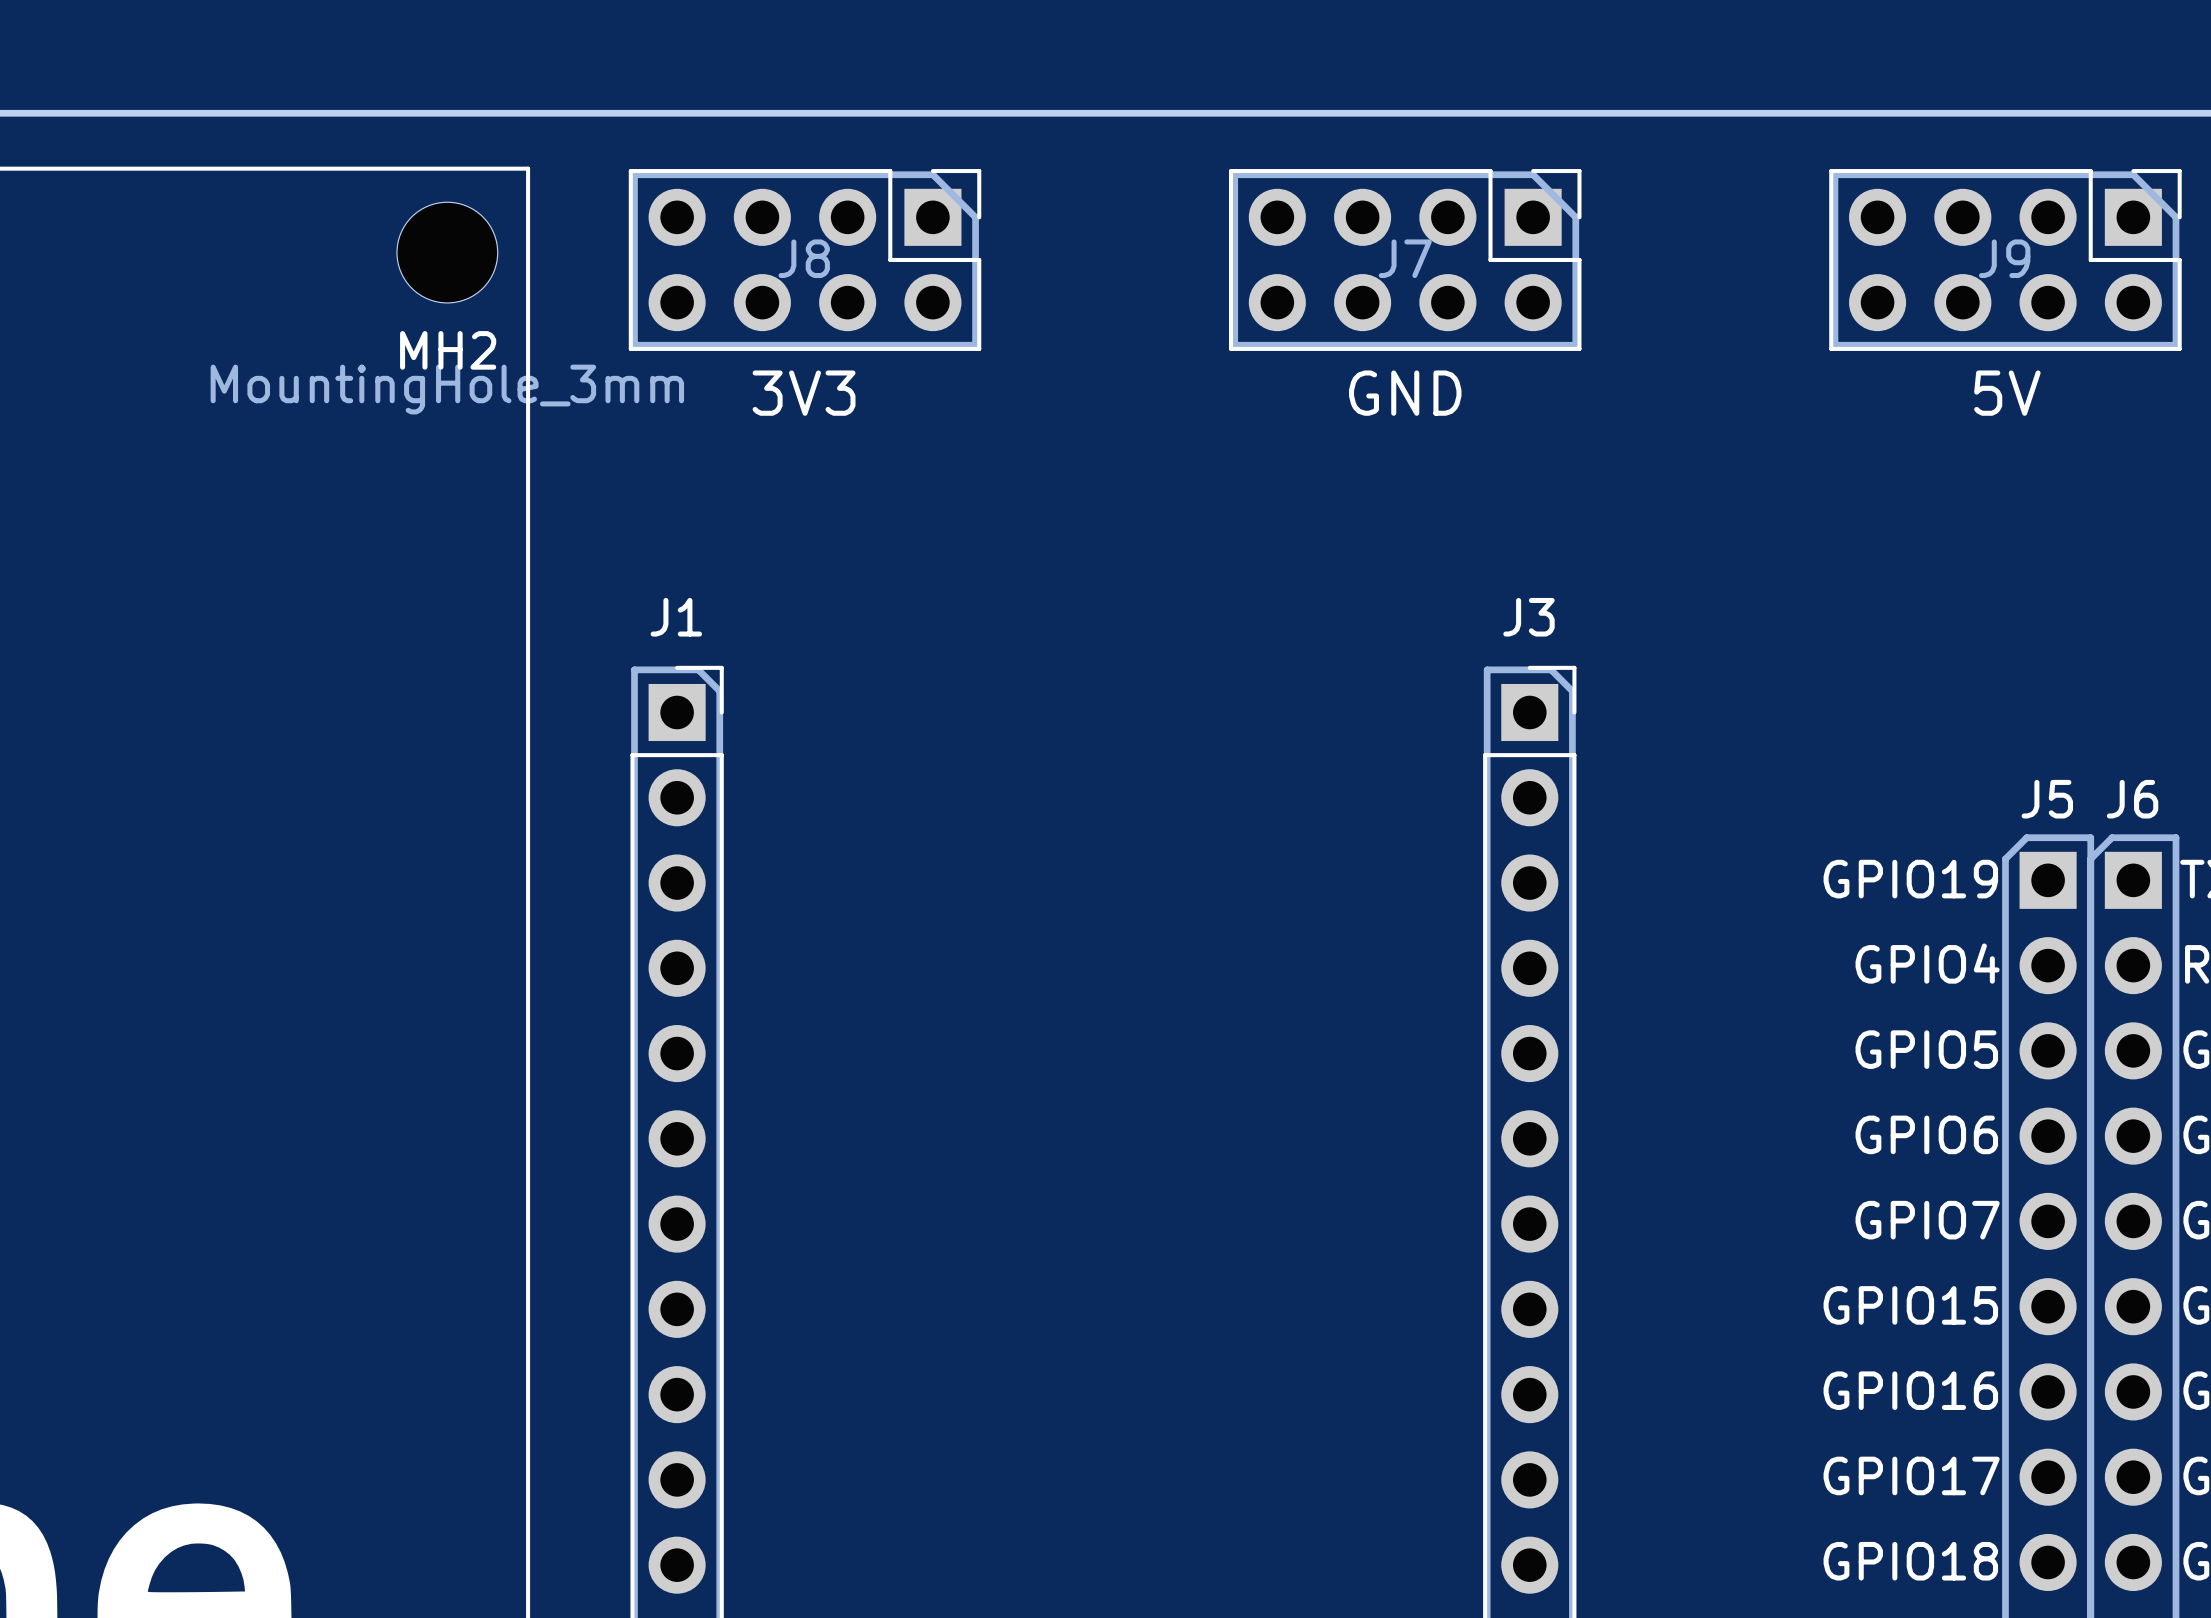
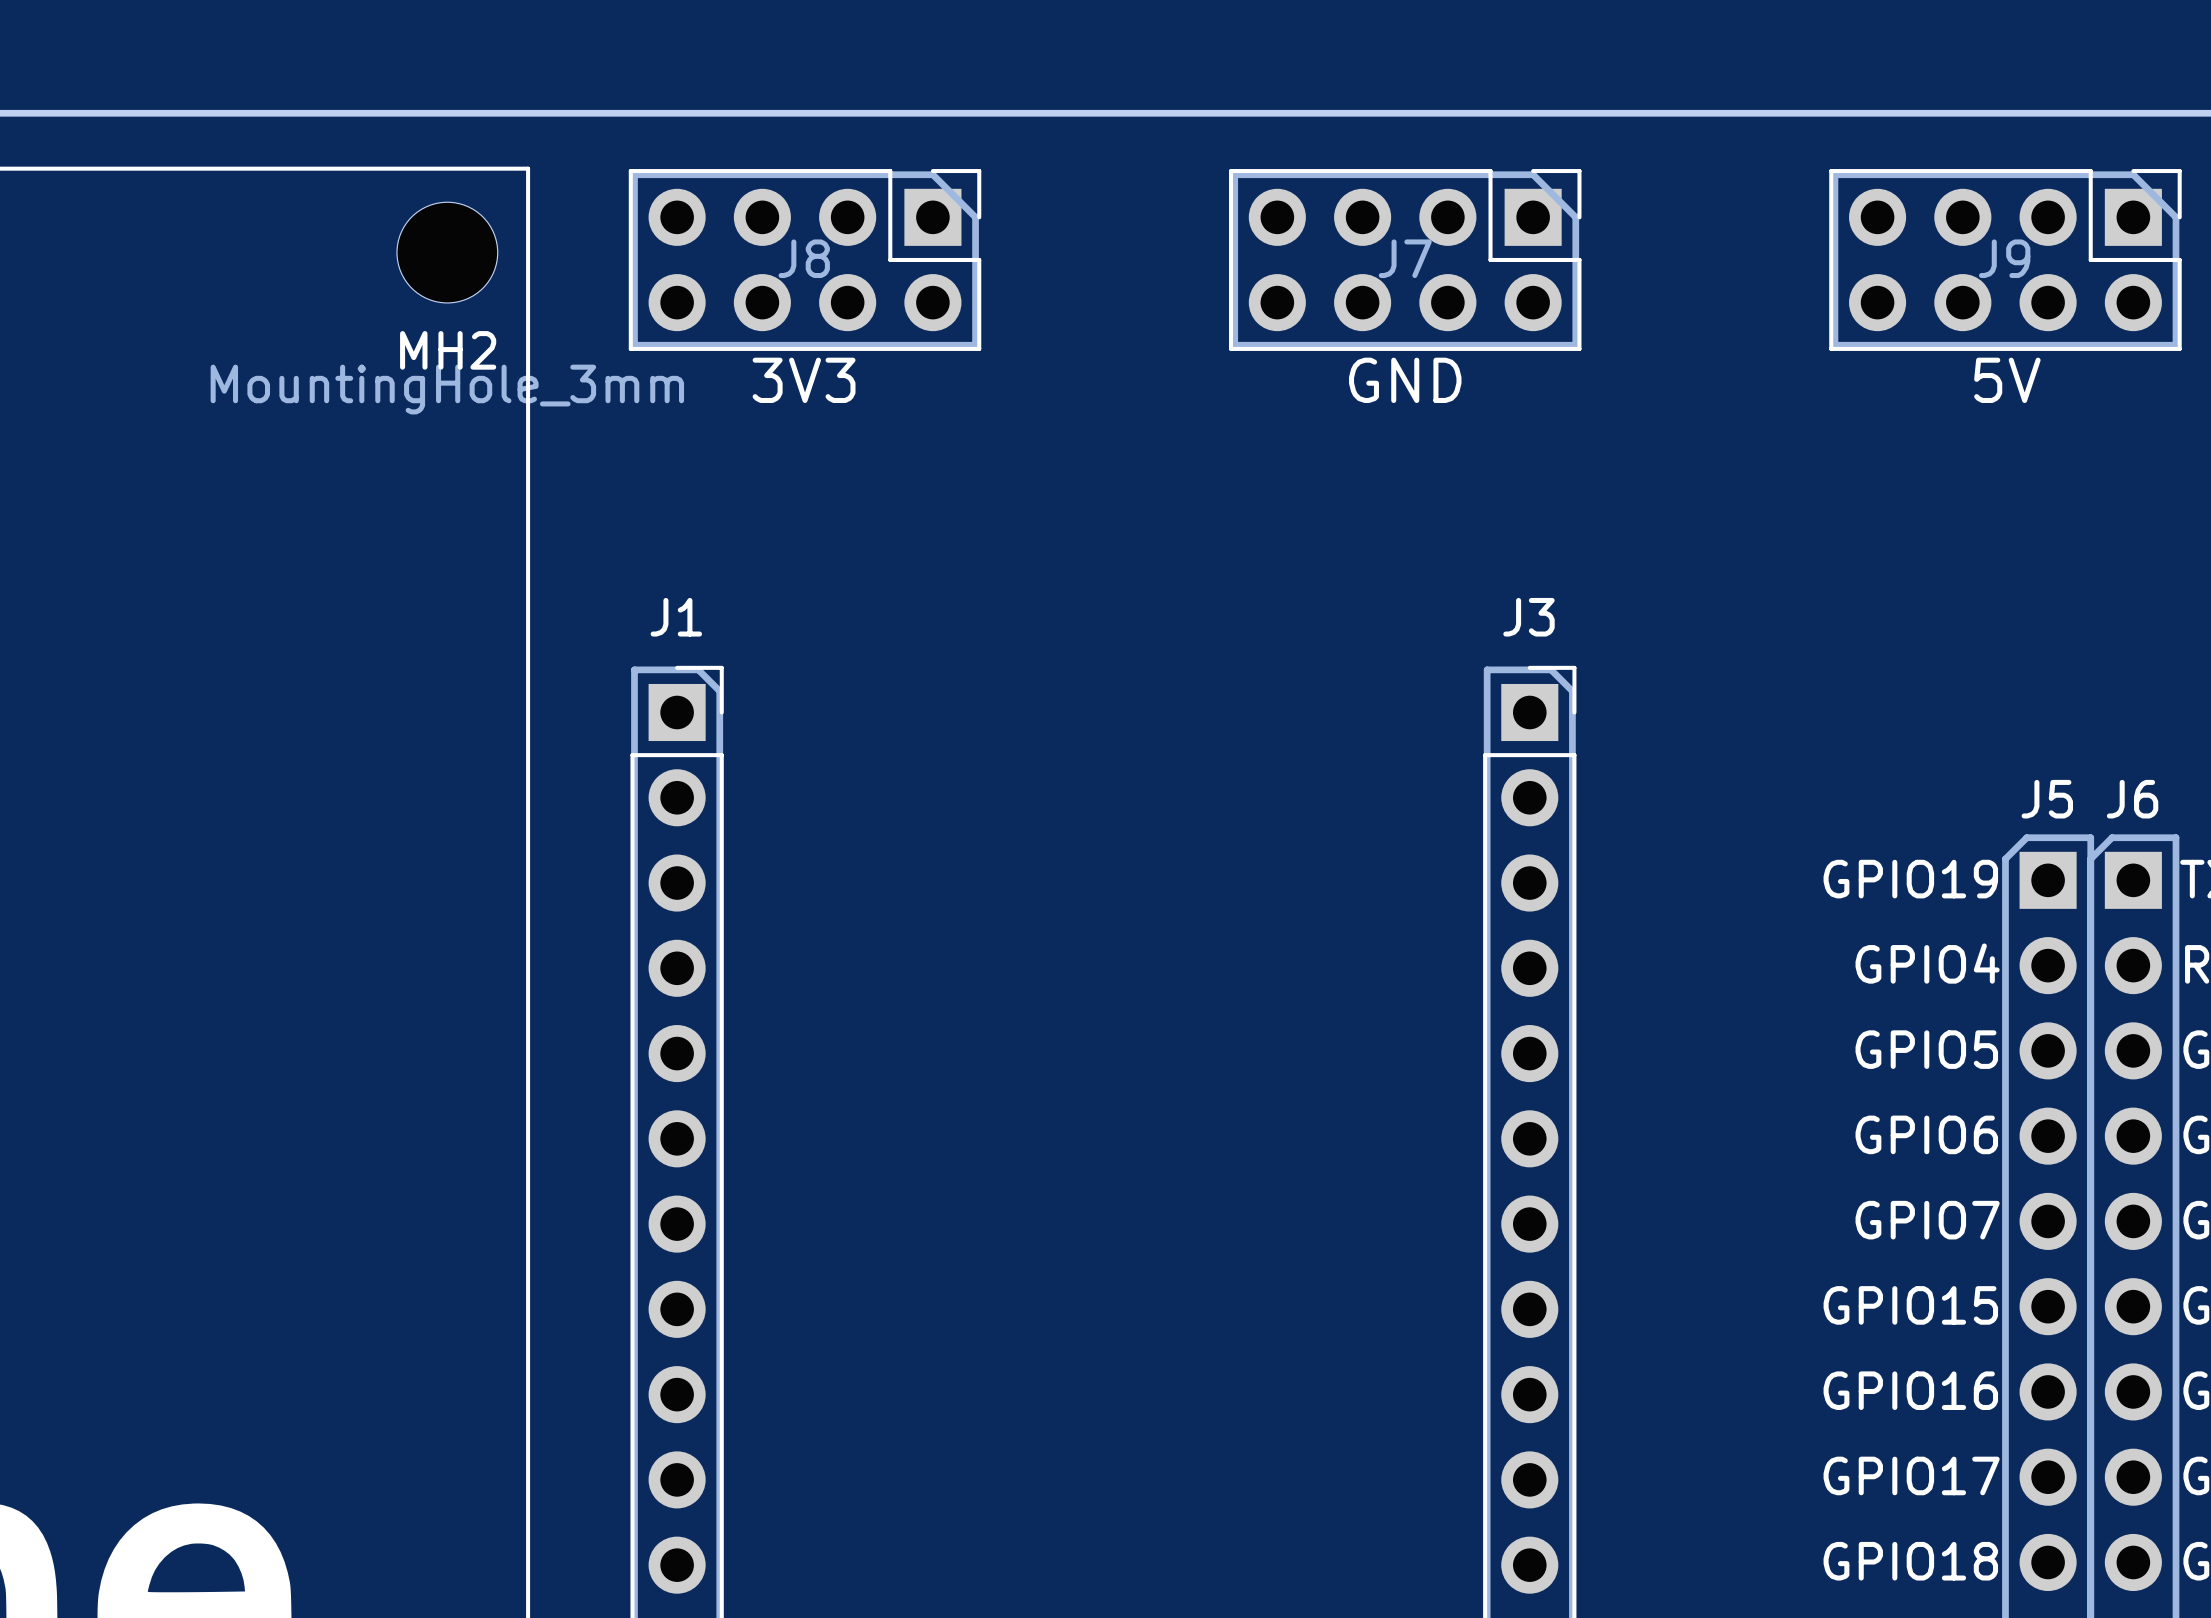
text position: 3V3 (804, 393) -> 3V3 (804, 380)
text position: GND (1405, 393) -> GND (1405, 380)
text position: 5V (2007, 393) -> 5V (2007, 380)

